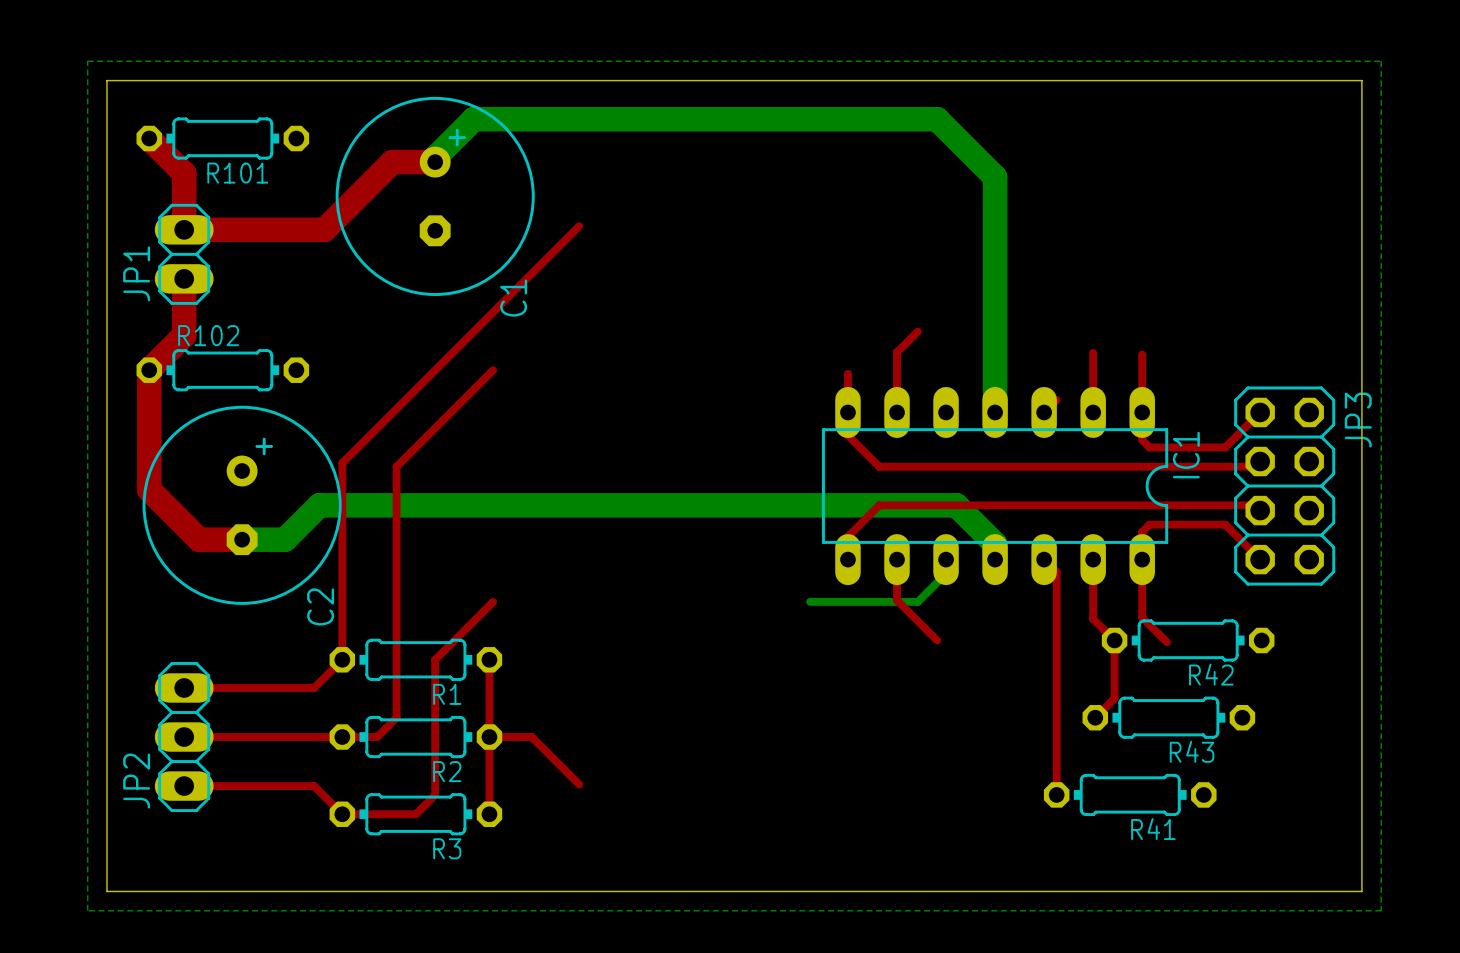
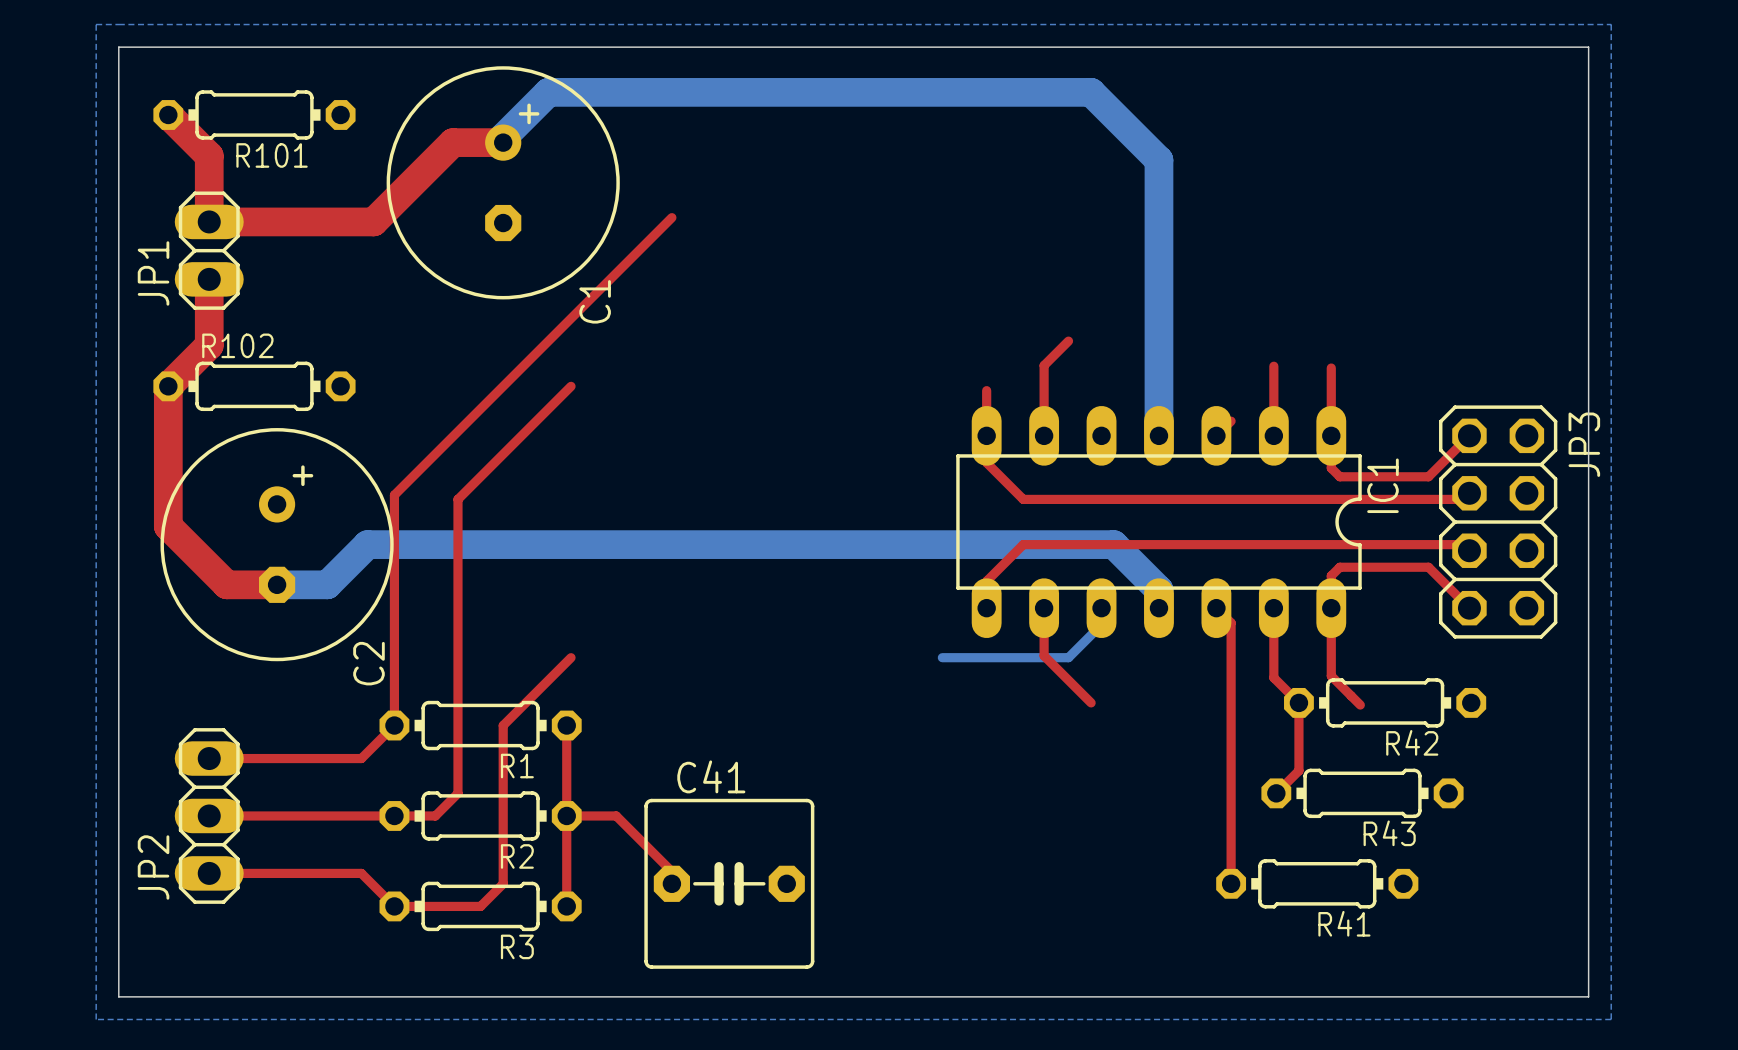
C41: none -> (729, 883)

